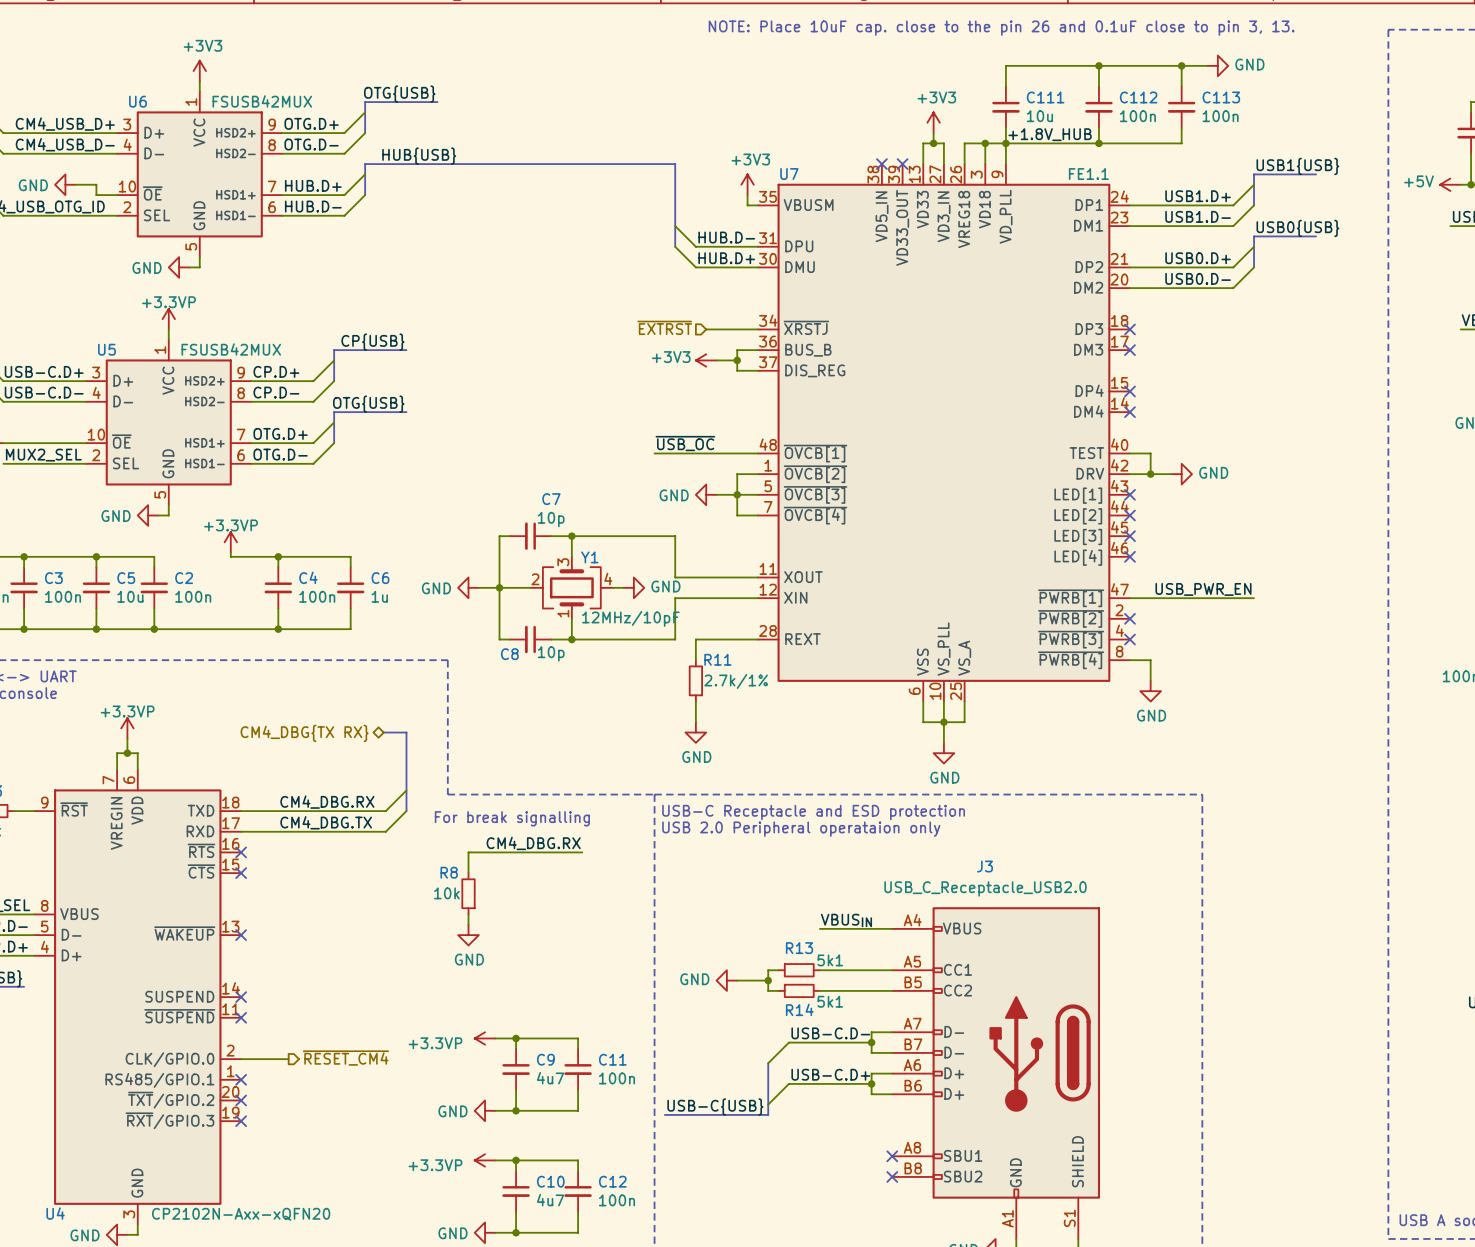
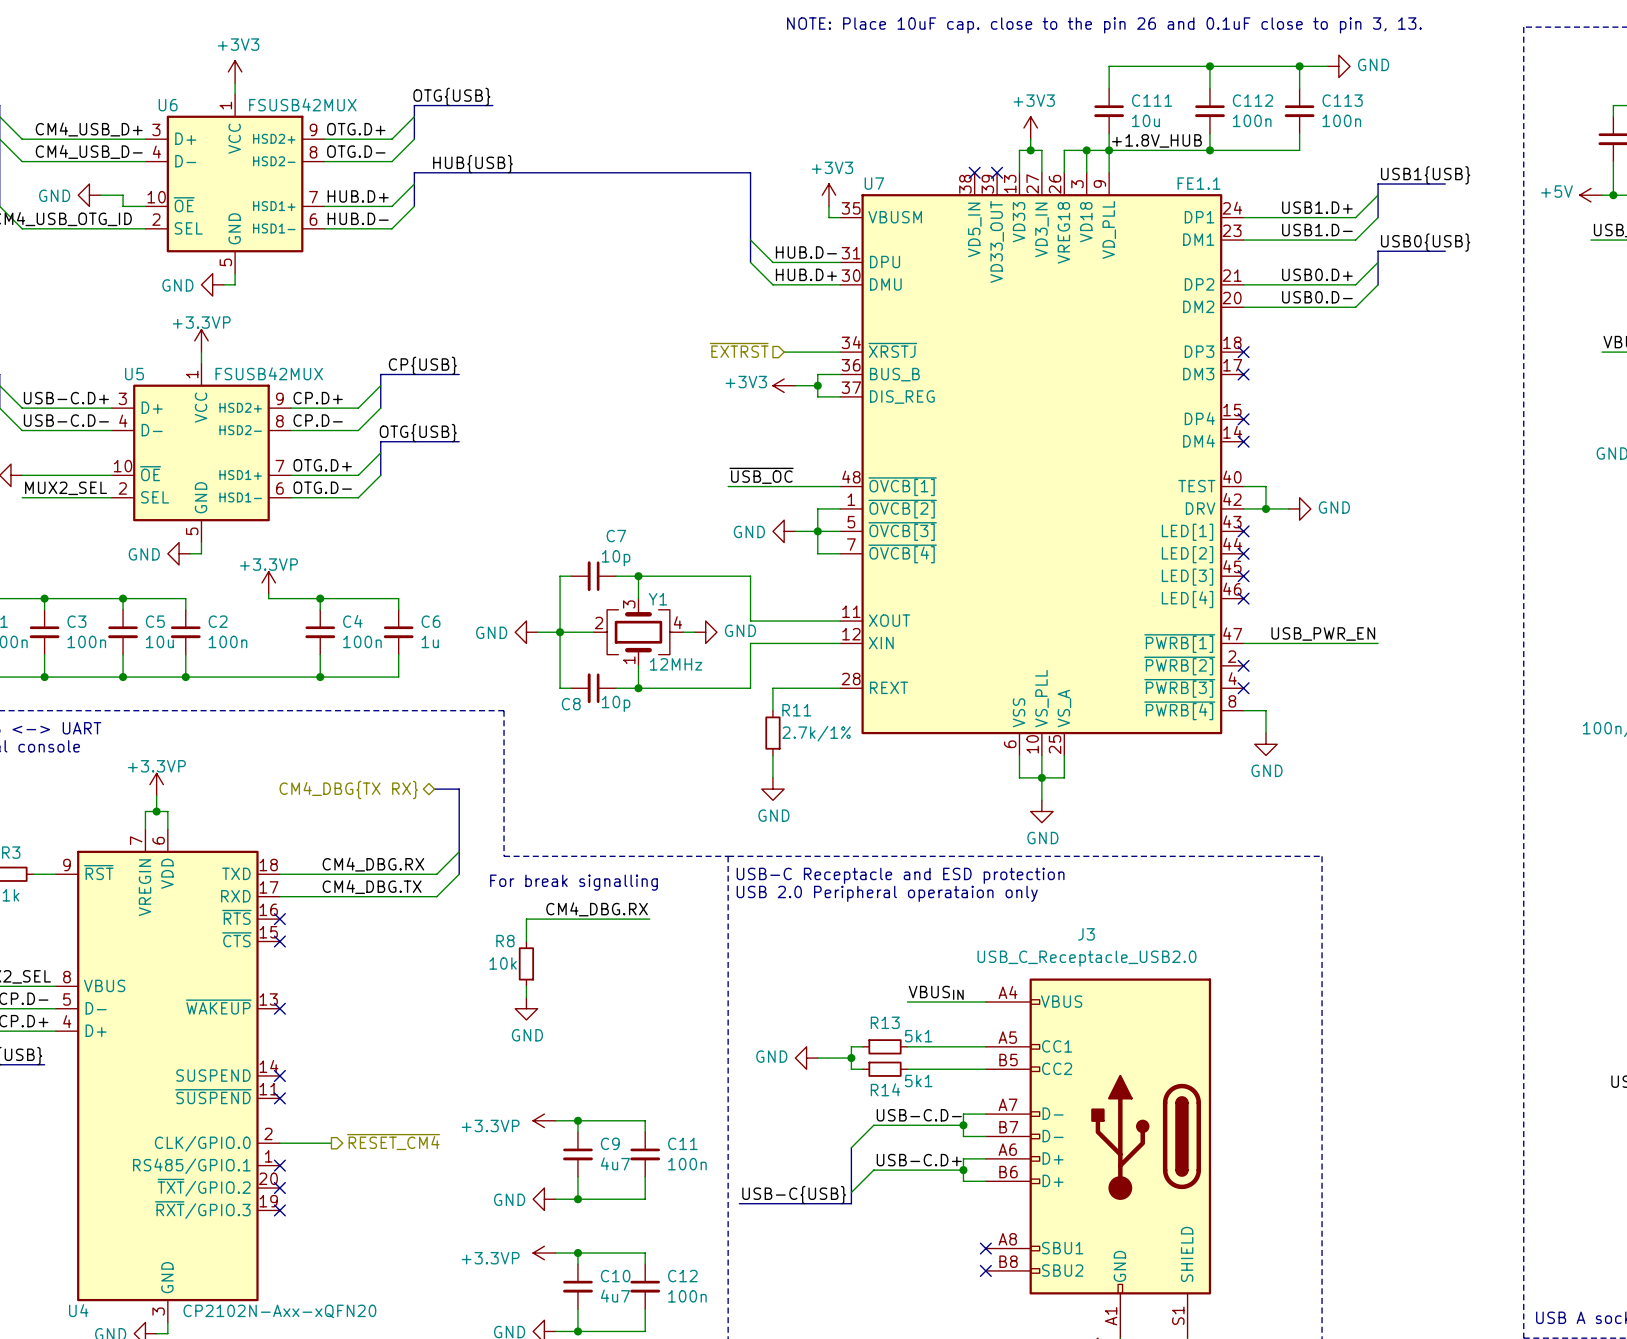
Y1 value: 12MHz/10pF (630, 618) -> 12MHz (676, 664)

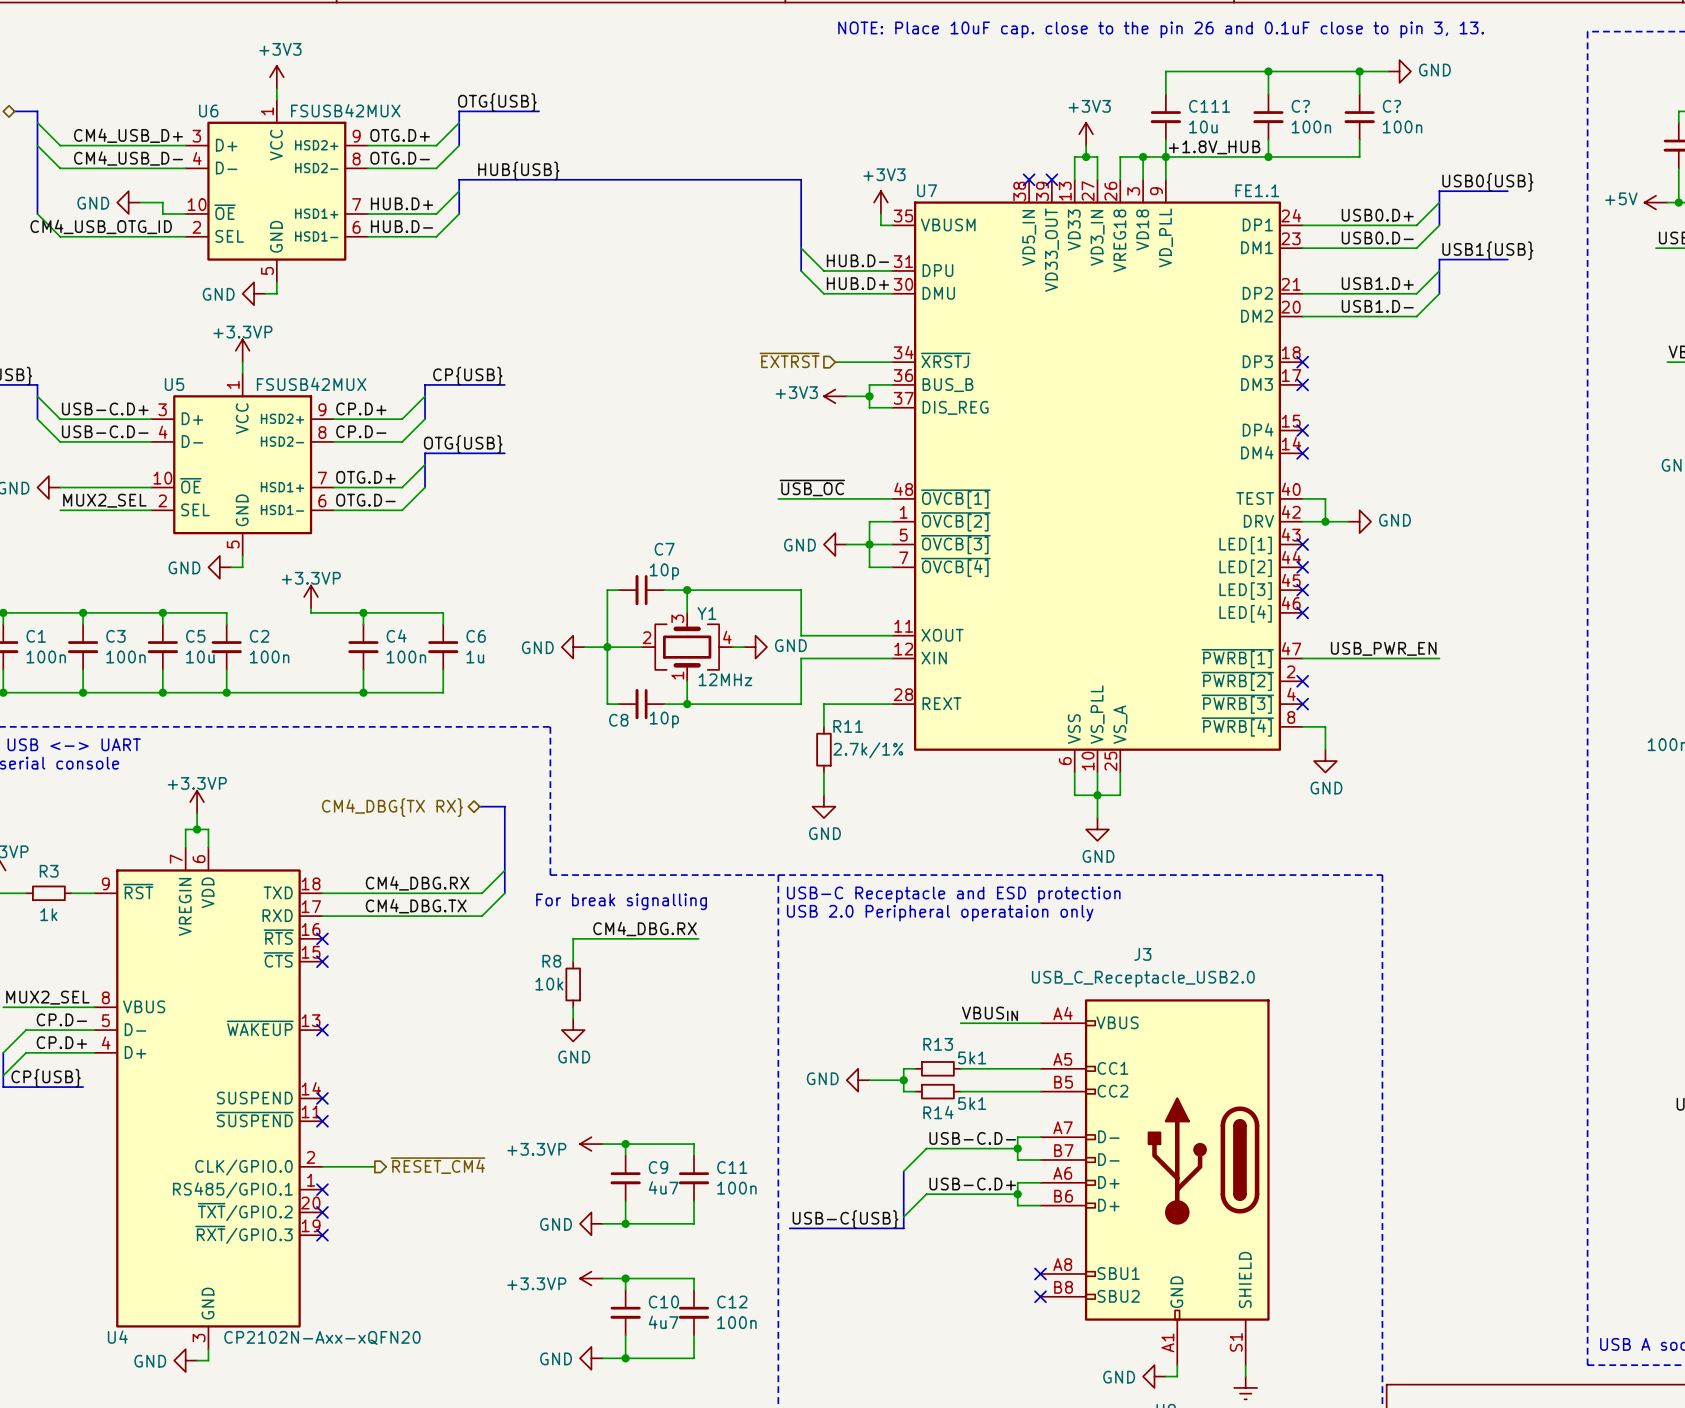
C112 name: C112 (1252, 100) -> C? (1300, 106)
C113 name: C113 (1342, 100) -> C? (1391, 106)
label: USB1{USB} (1425, 175) -> USB0{USB} (1487, 182)
label: USB1.D+ (1317, 207) -> USB0.D+ (1377, 215)
label: USB1.D- (1317, 230) -> USB0.D- (1377, 238)
label: USB0{USB} (1425, 242) -> USB1{USB} (1487, 250)
label: USB0.D+ (1317, 274) -> USB1.D+ (1377, 283)
label: USB0.D- (1317, 297) -> USB1.D- (1377, 306)

